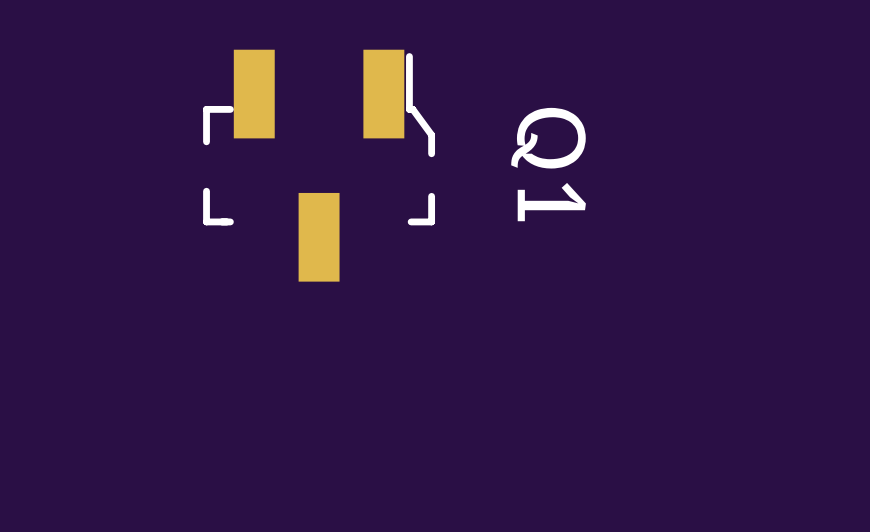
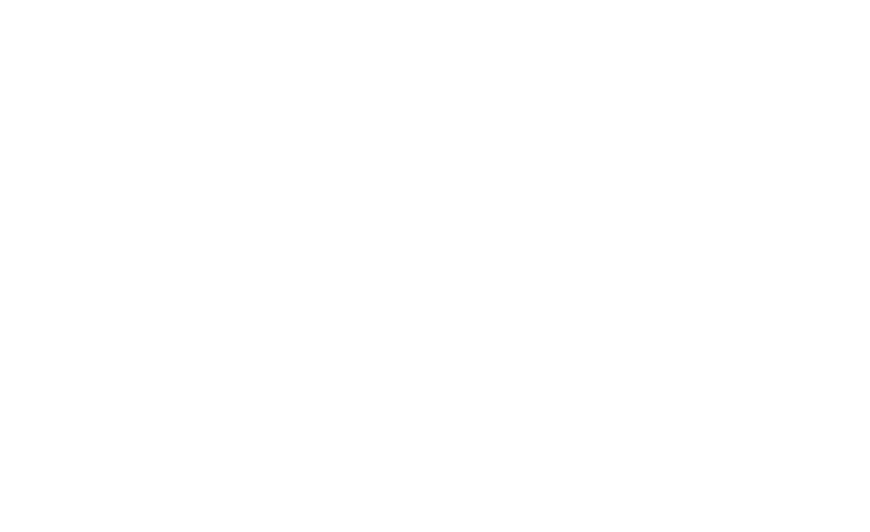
Q1: (319, 165) -> none

